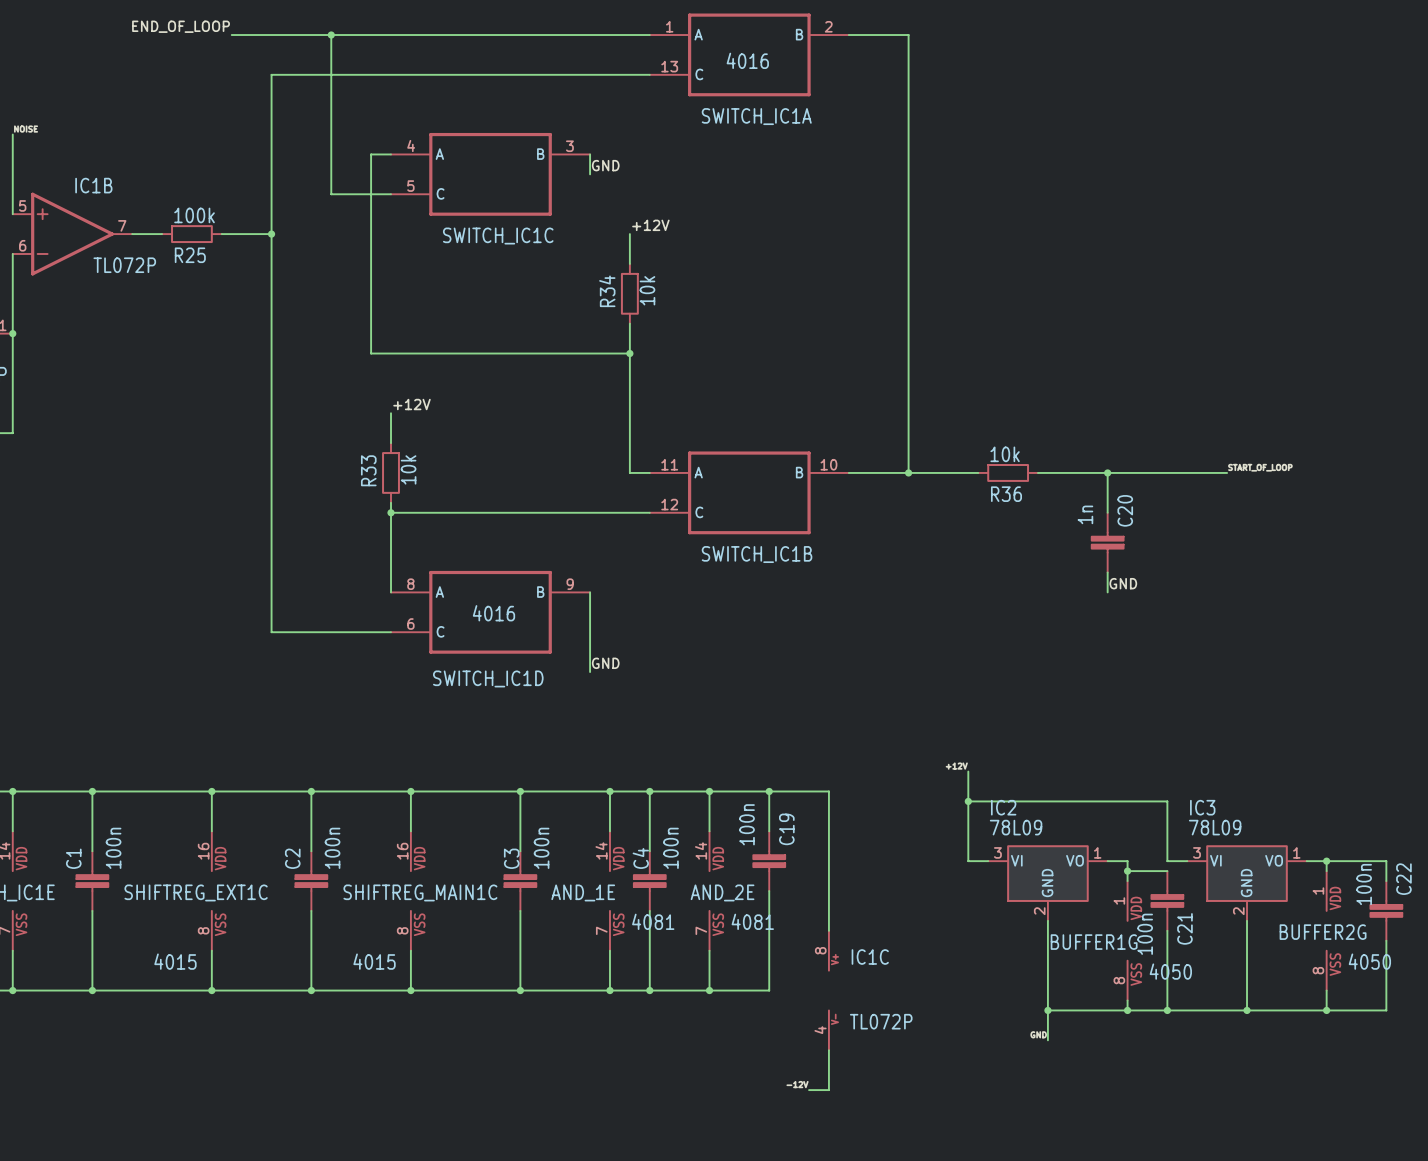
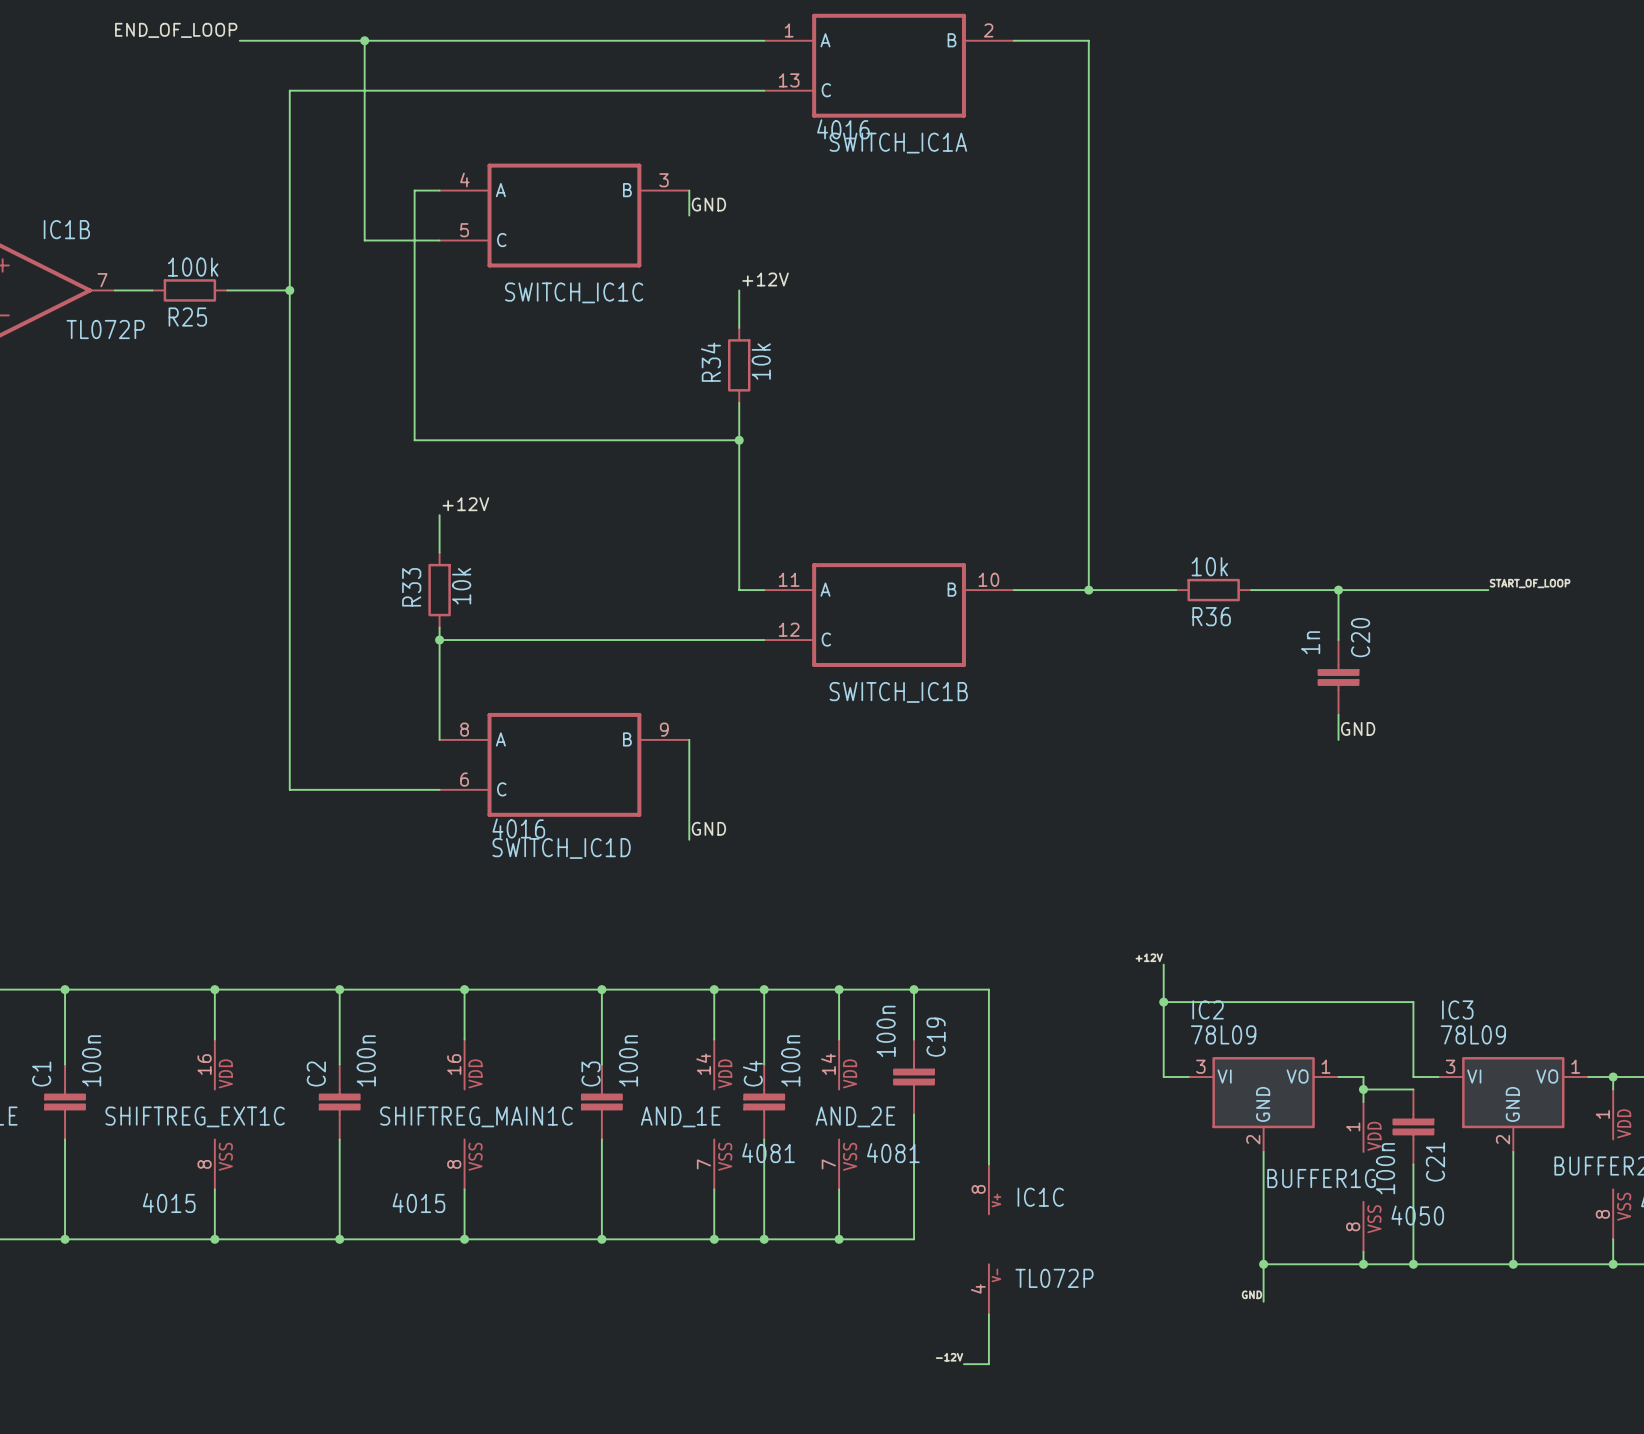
SWITCH_IC1A value position: 4016 (747, 60) -> 4016 (843, 129)
SWITCH_IC1D value position: 4016 (493, 613) -> 4016 (518, 828)

